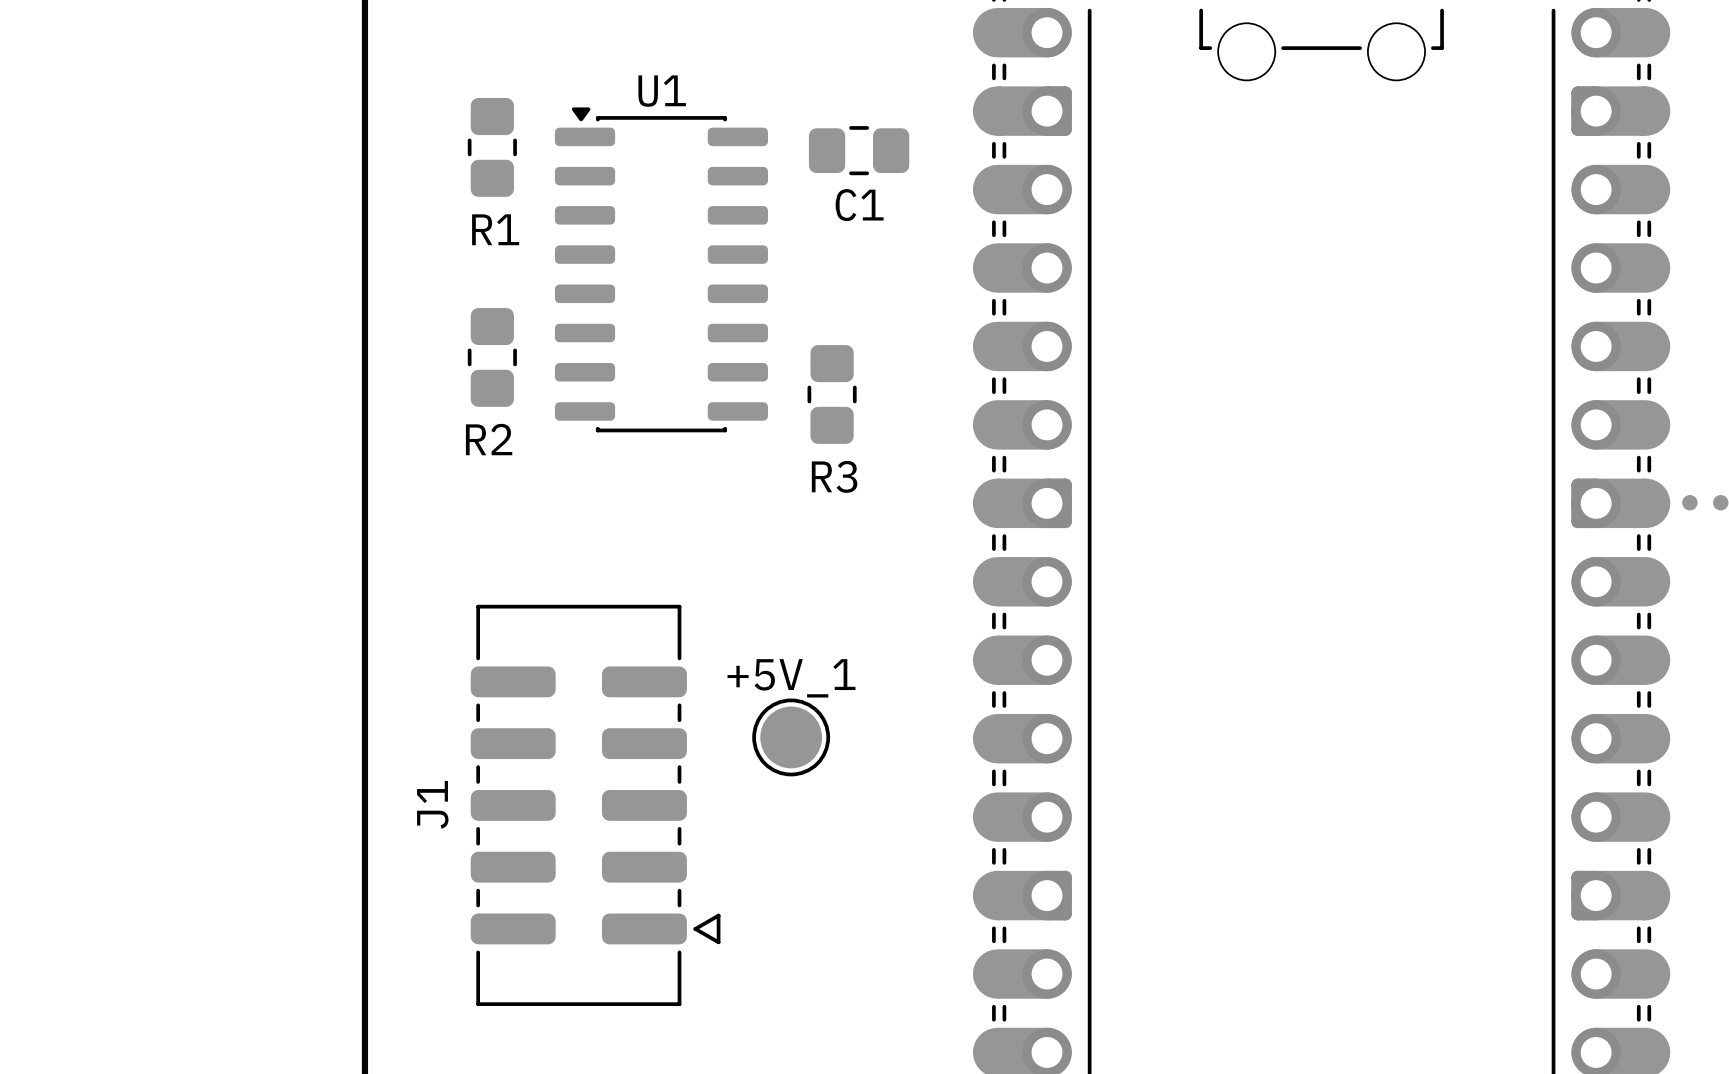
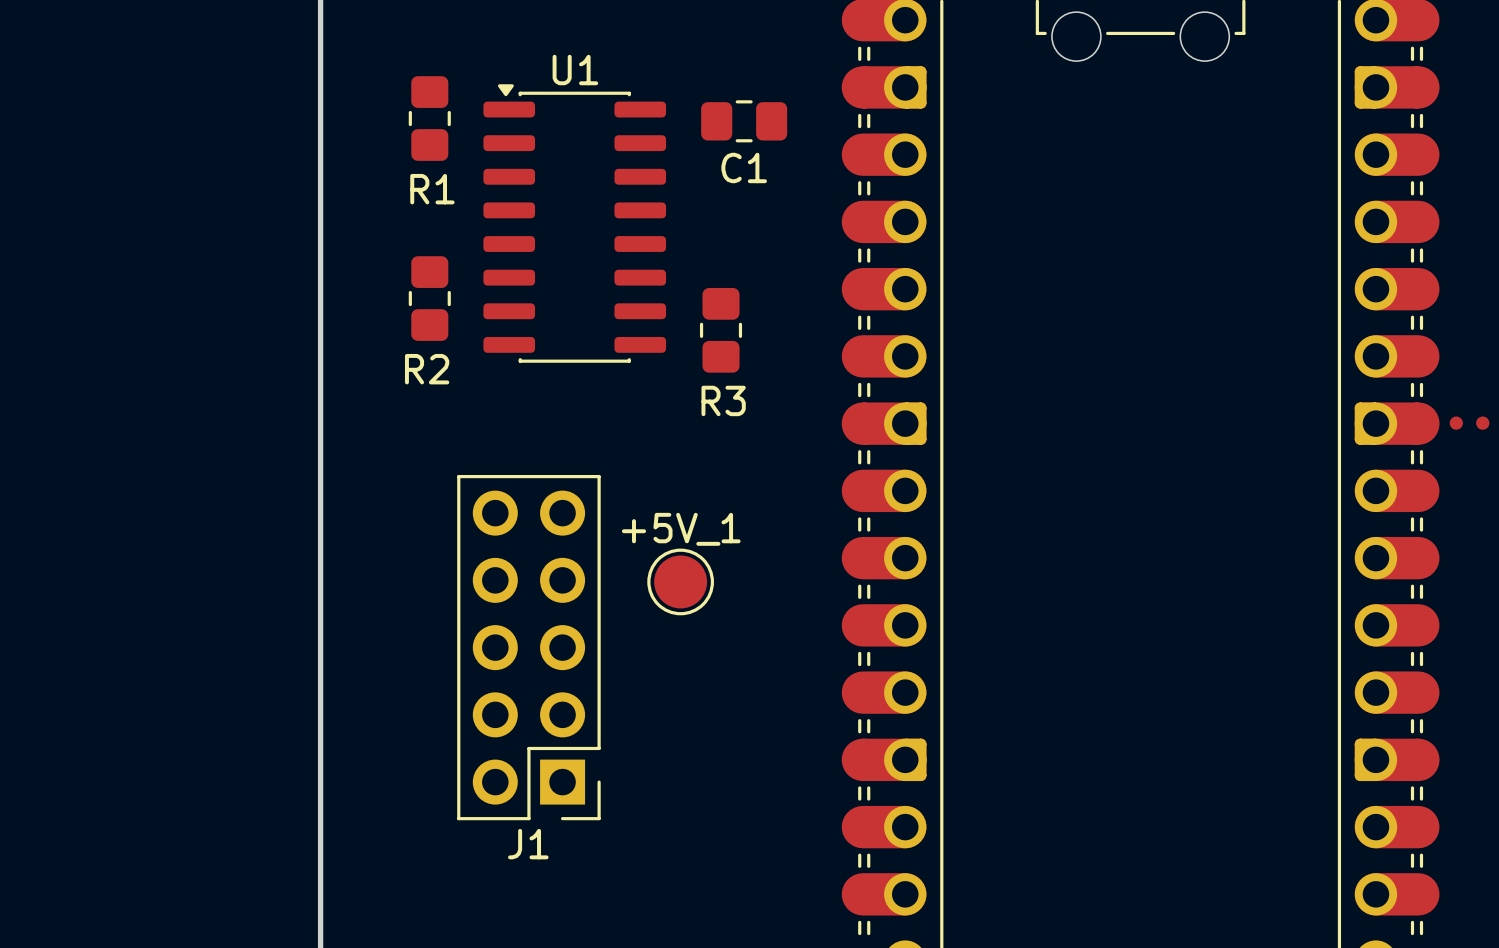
J1 footprint: [470, 604, 721, 1006] -> [457, 475, 601, 821]
+5V_1 position: (791, 737) -> (680, 581)
J1 name position: J1 (432, 804) -> J1 (528, 844)

